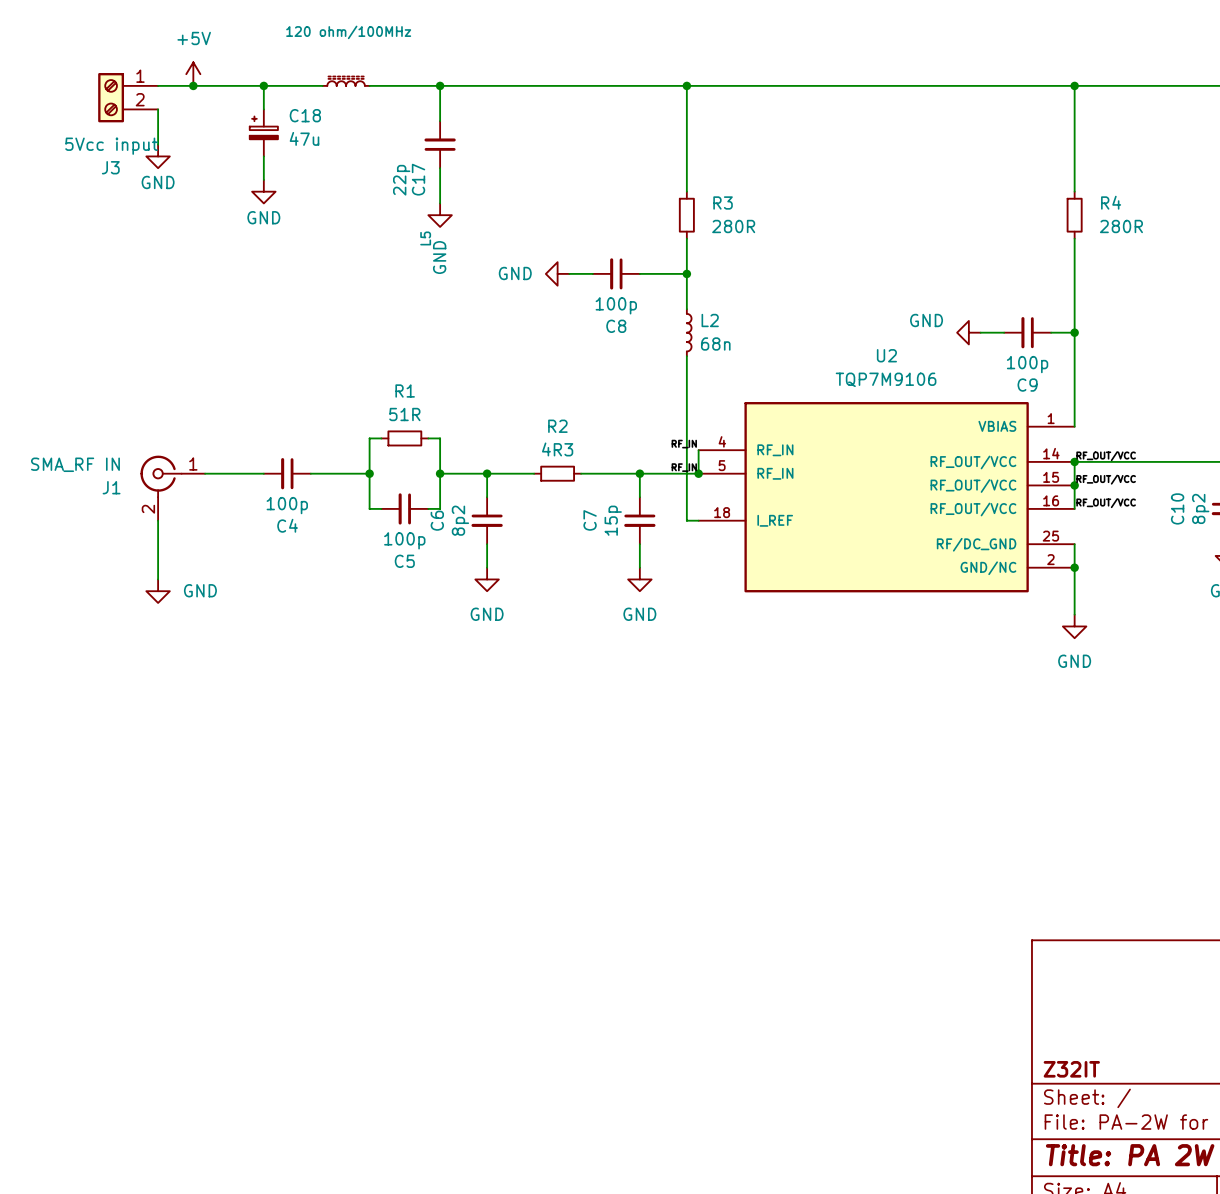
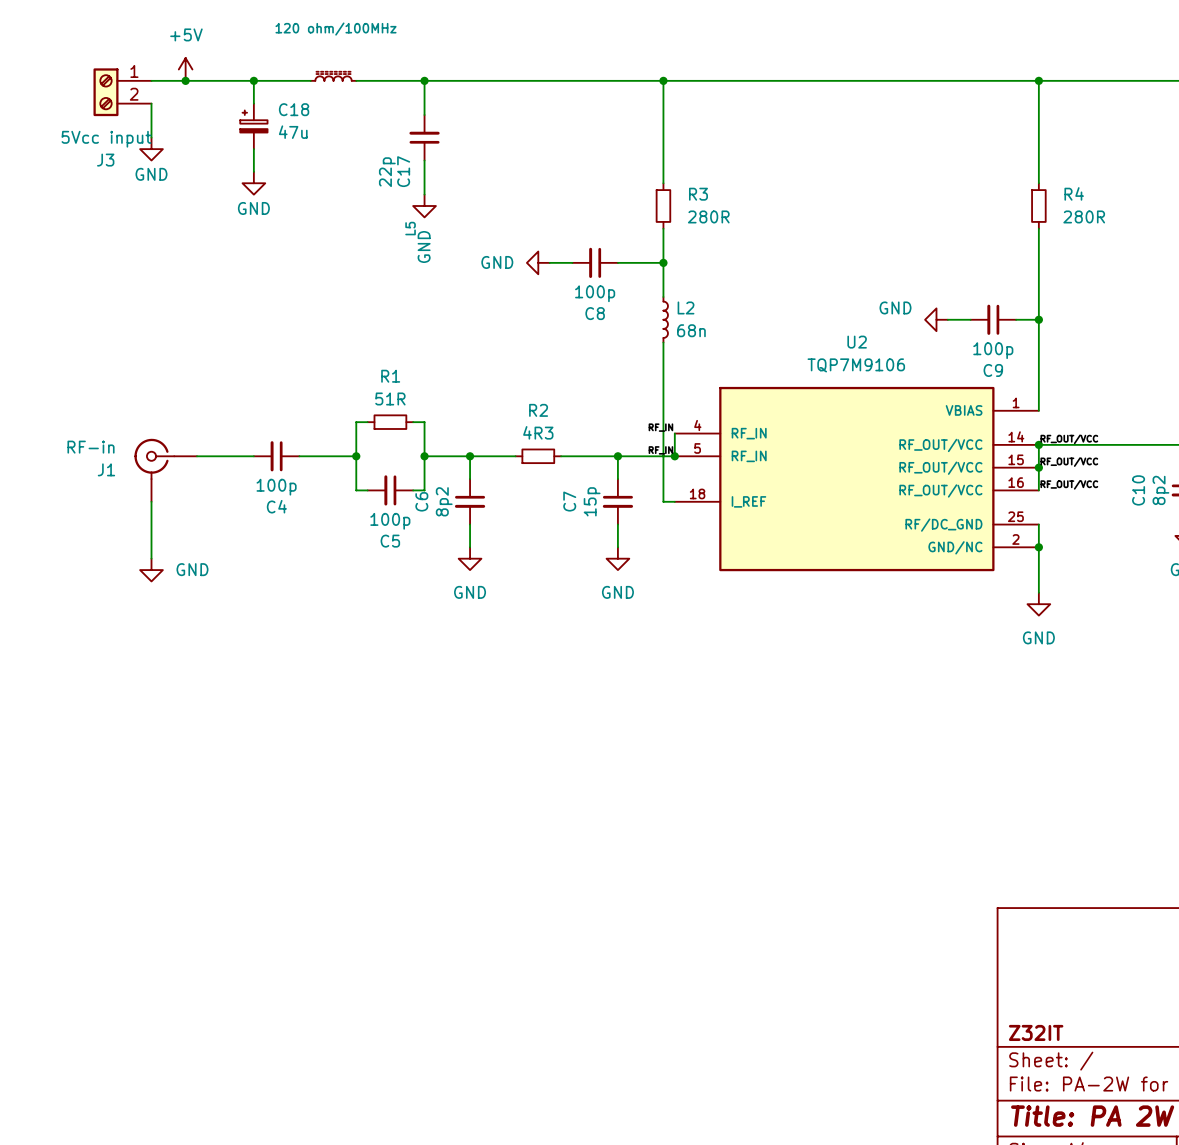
J1 value: SMA_RF IN (75, 464) -> RF-in (91, 447)
J1 pin number: 1 (193, 464) -> none
J1 pin number: 2 (148, 509) -> none

